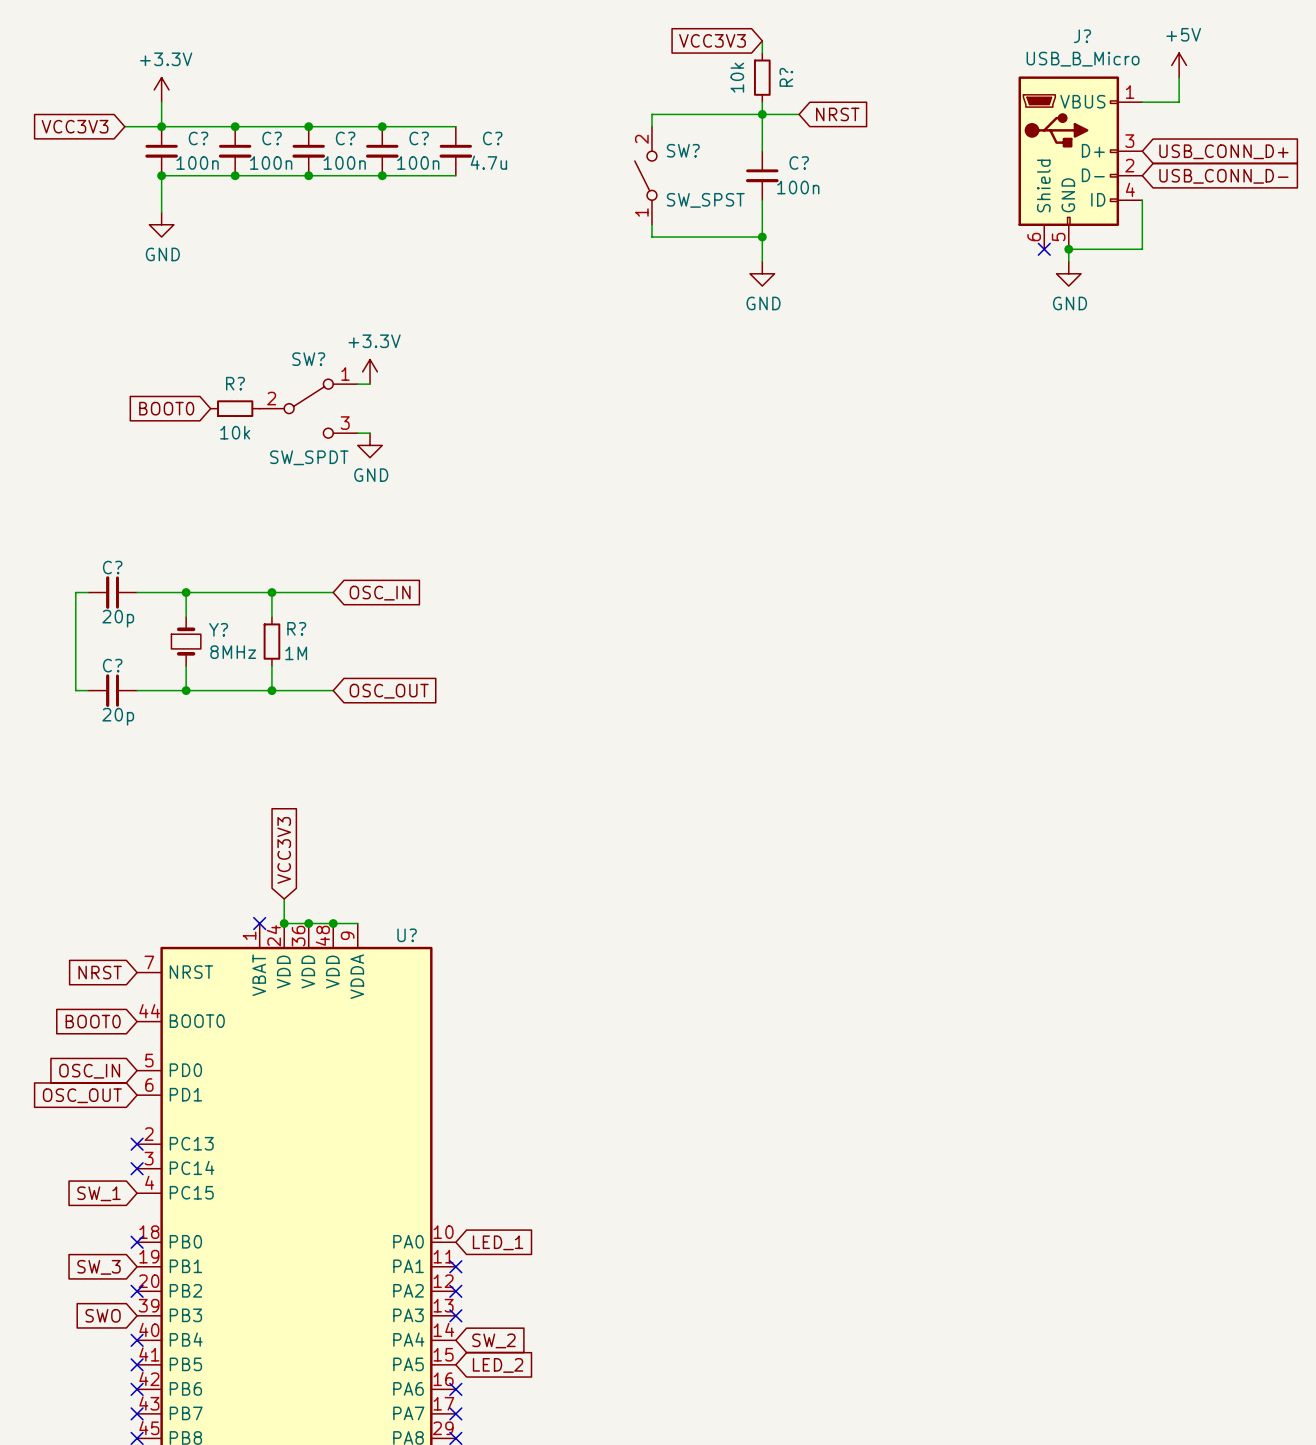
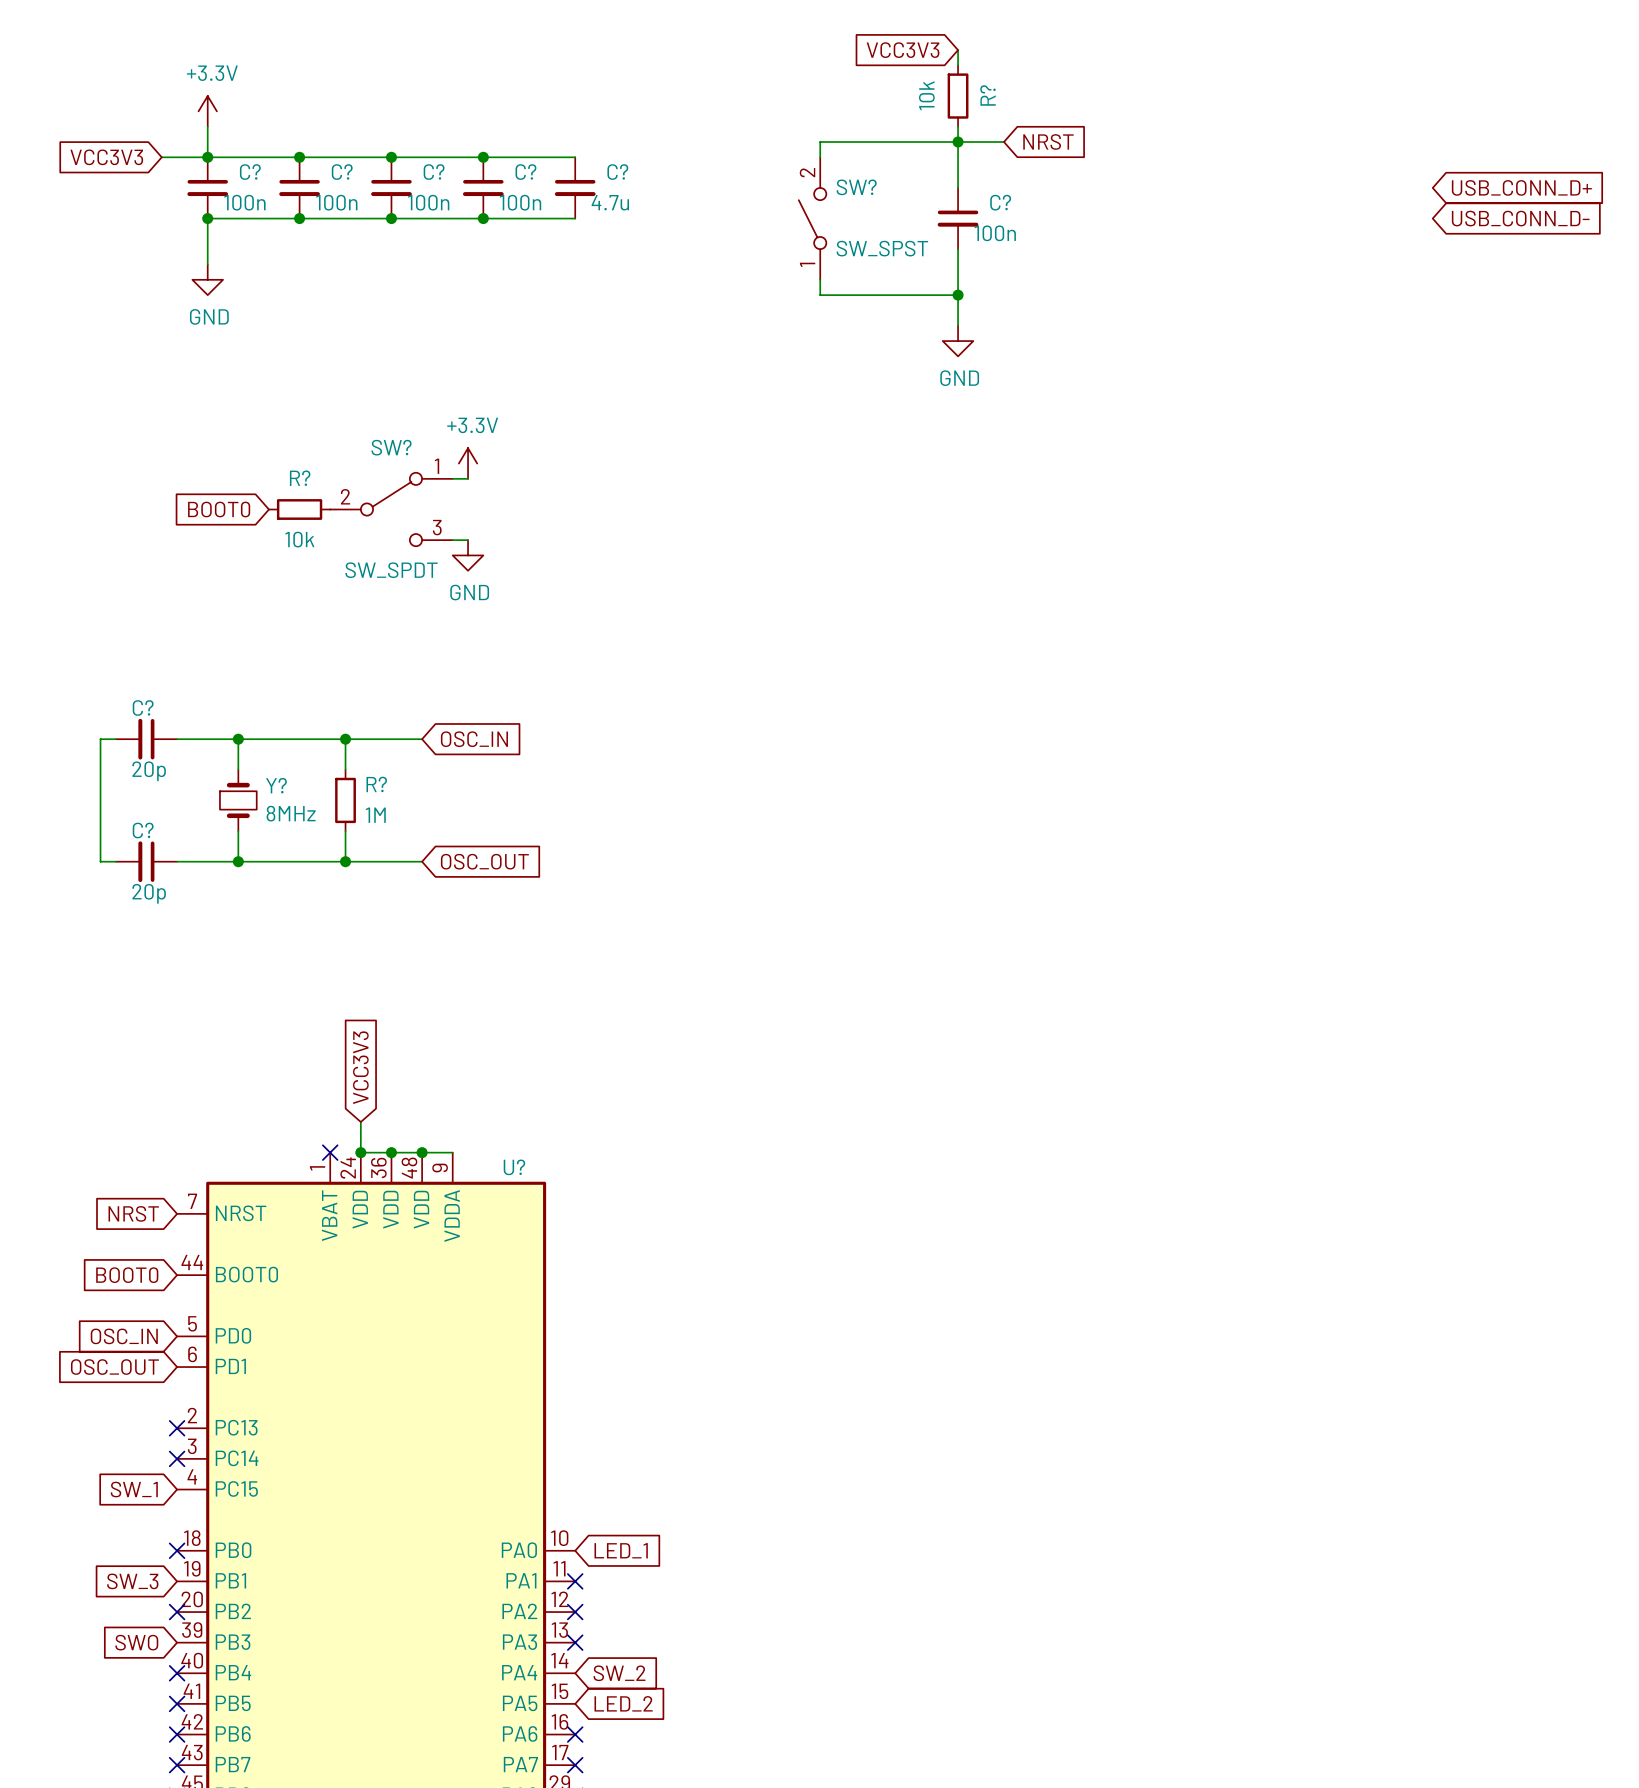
power symbol: +5V (1179, 65) -> none
wire: (1179, 77) (1179, 102) (1142, 102) -> none
J?: USB_B_Micro (1080, 162) -> none
wire: (1142, 200) (1142, 249) (1068, 249) (1068, 261) -> none
no-connect mark: (1044, 249) -> none
junction: (1068, 249) -> none
power symbol: GND (1068, 273) -> none

